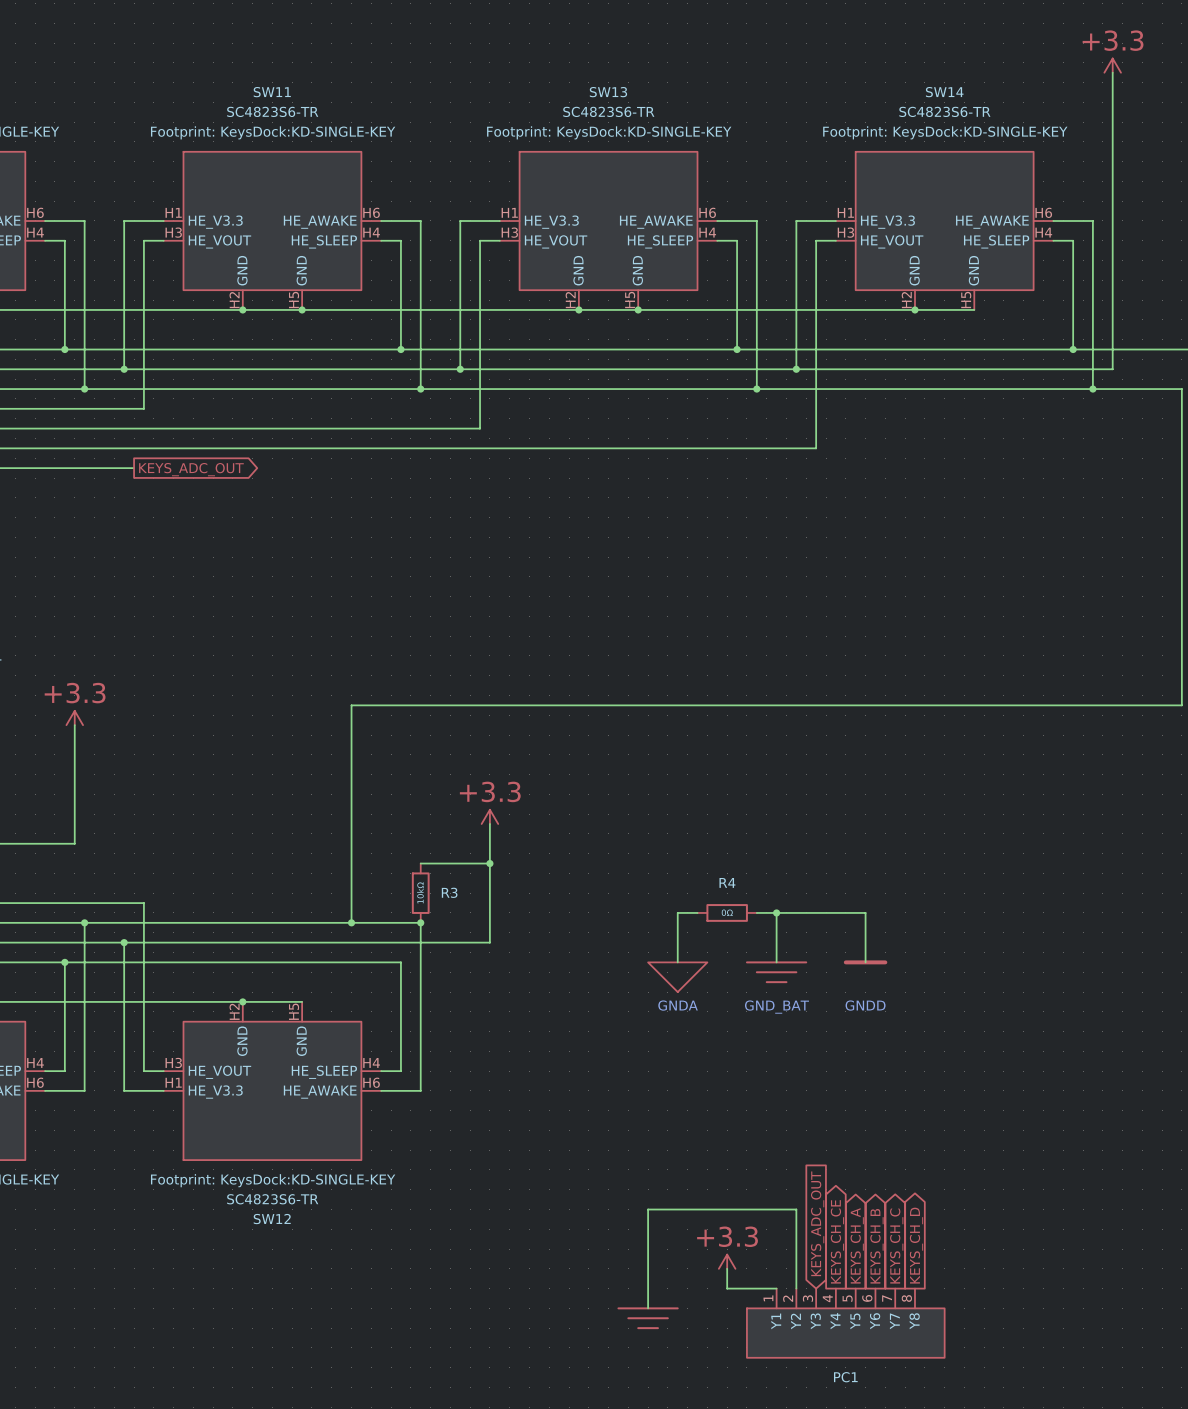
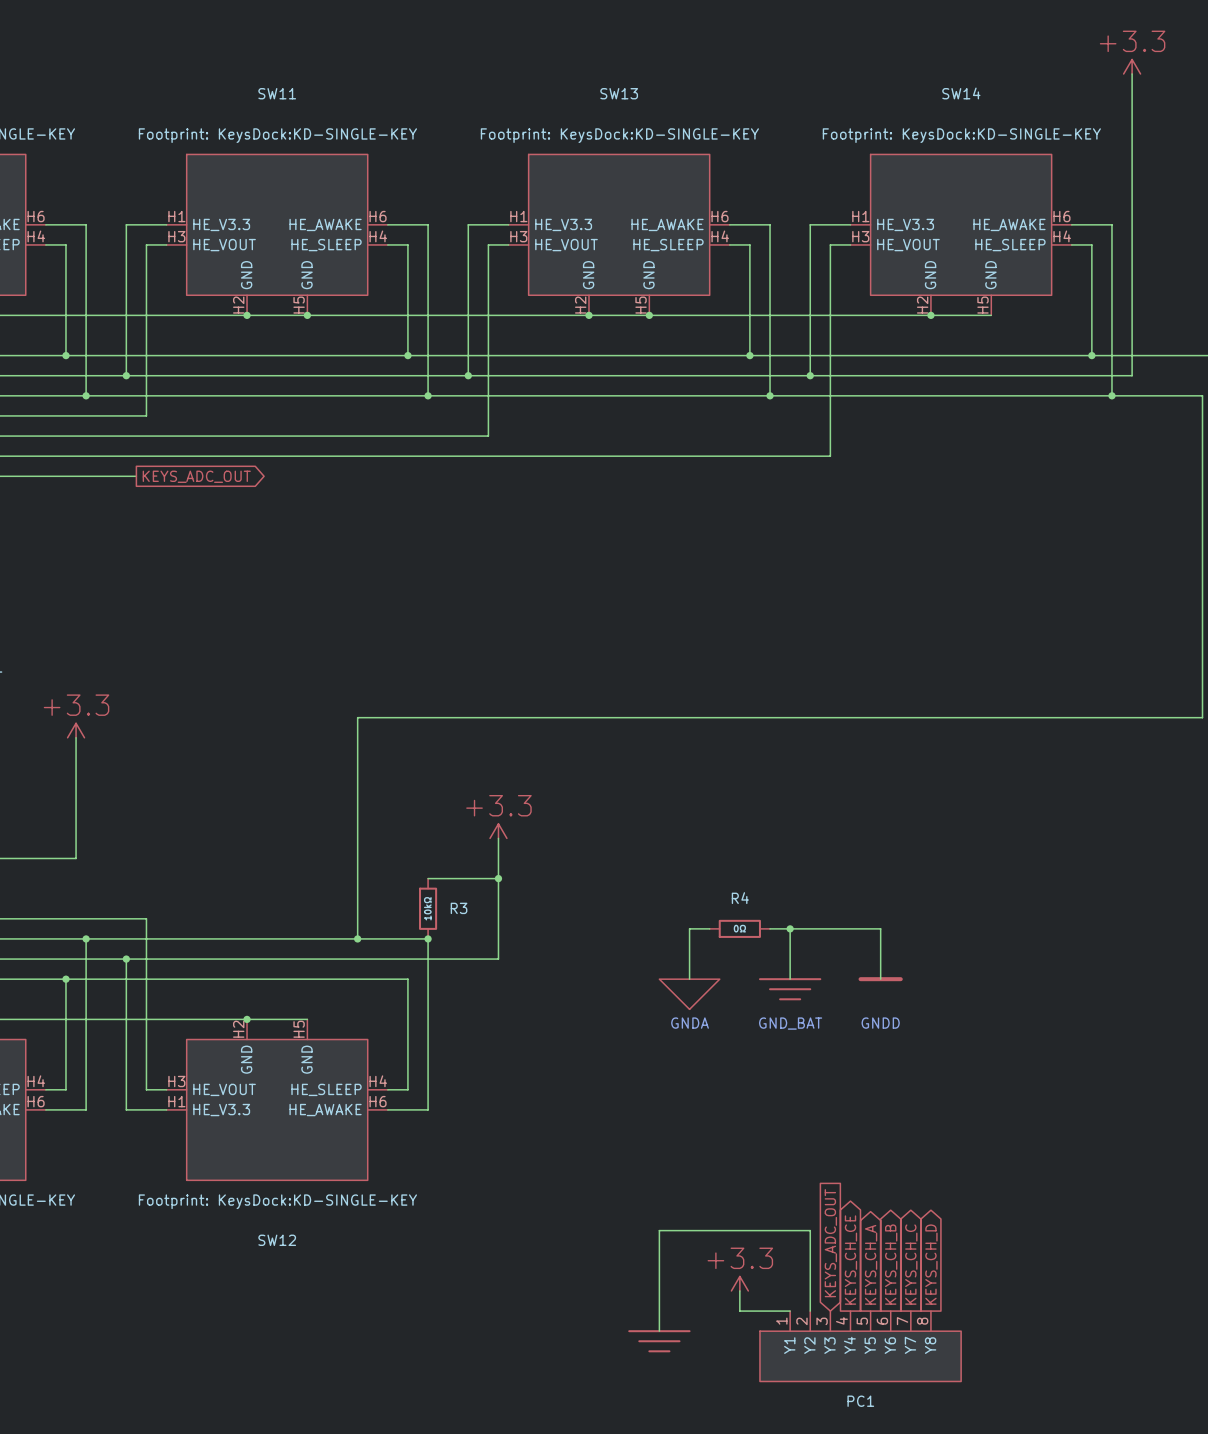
SW11 value: SC4823S6-TR (272, 111) -> none
SW13 value: SC4823S6-TR (608, 111) -> none
SW14 value: SC4823S6-TR (944, 111) -> none
SW12 value: SC4823S6-TR (272, 1199) -> none

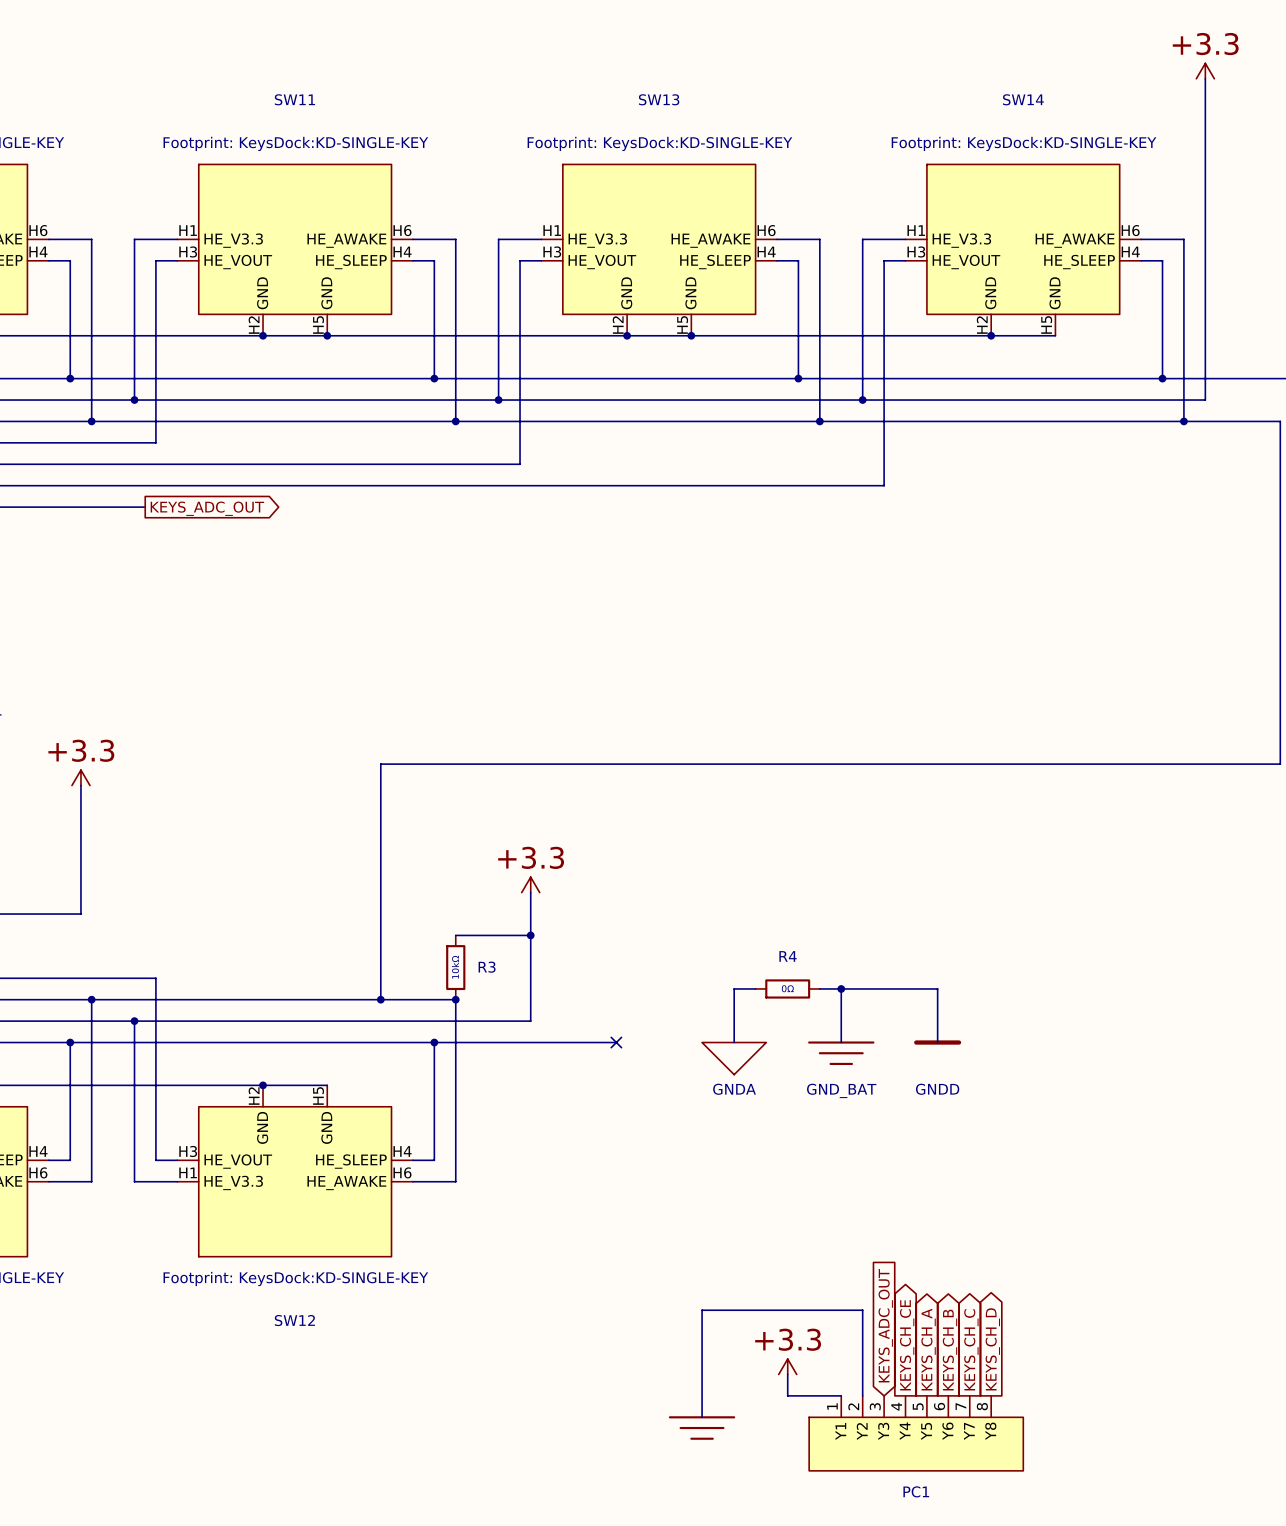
wire: none -> (434, 1042) (616, 1042)
junction: none -> (434, 1042)
no-connect mark: none -> (616, 1042)

